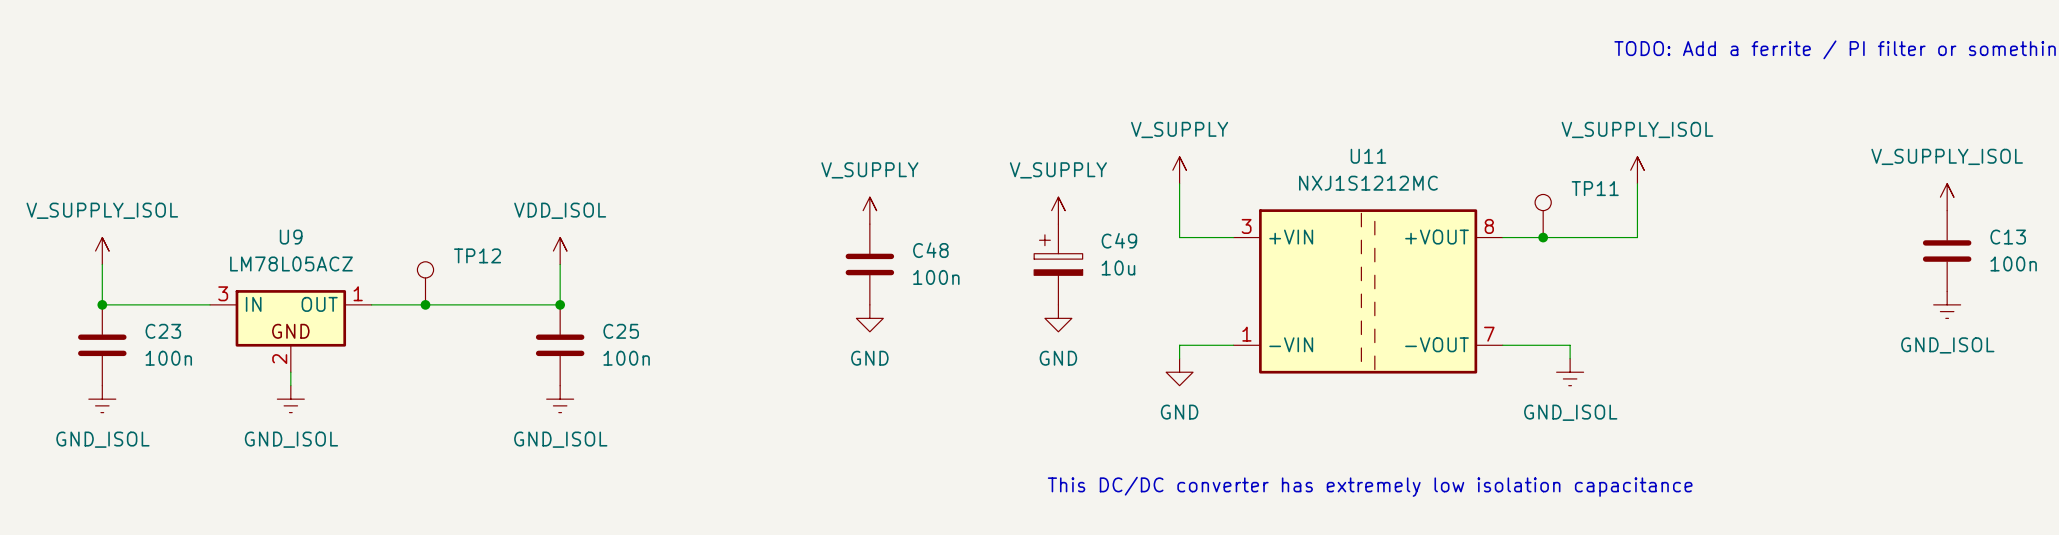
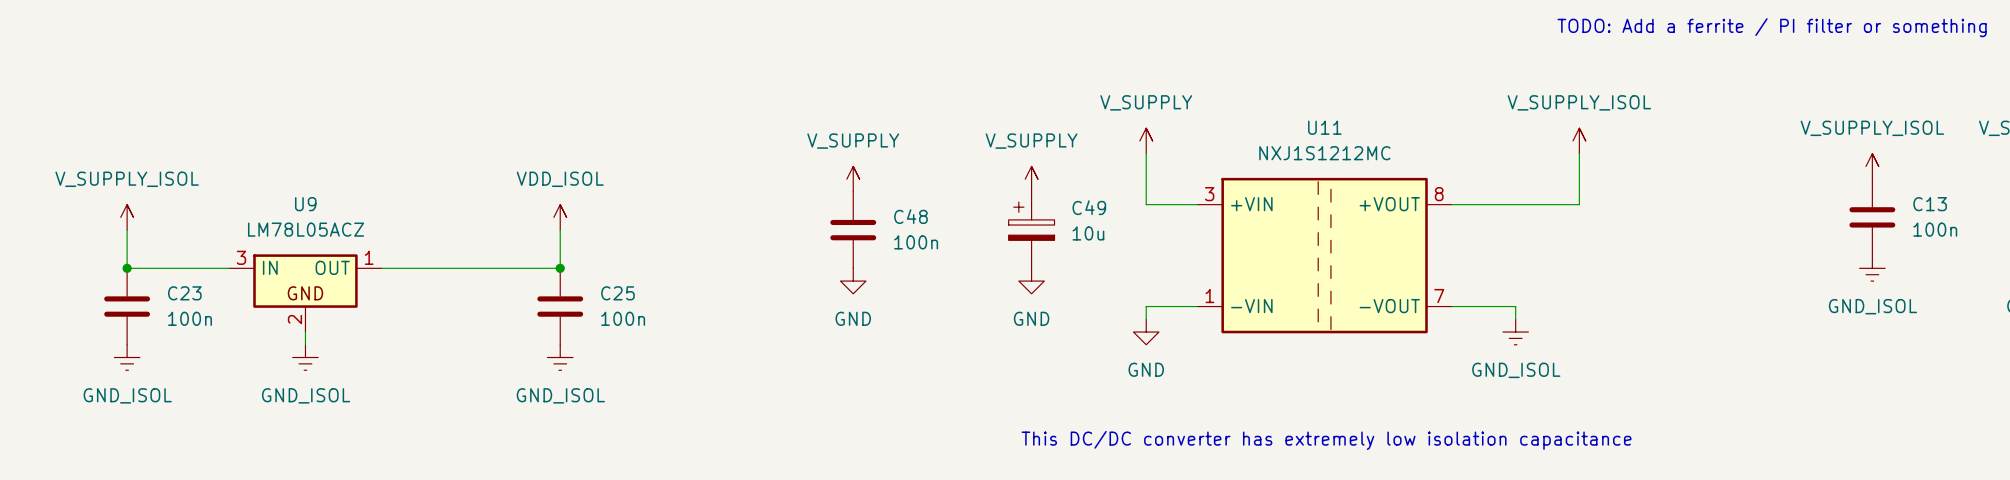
TP11: (1543, 216) -> none
junction: (1543, 237) -> none
TP12: (425, 283) -> none
junction: (425, 304) -> none

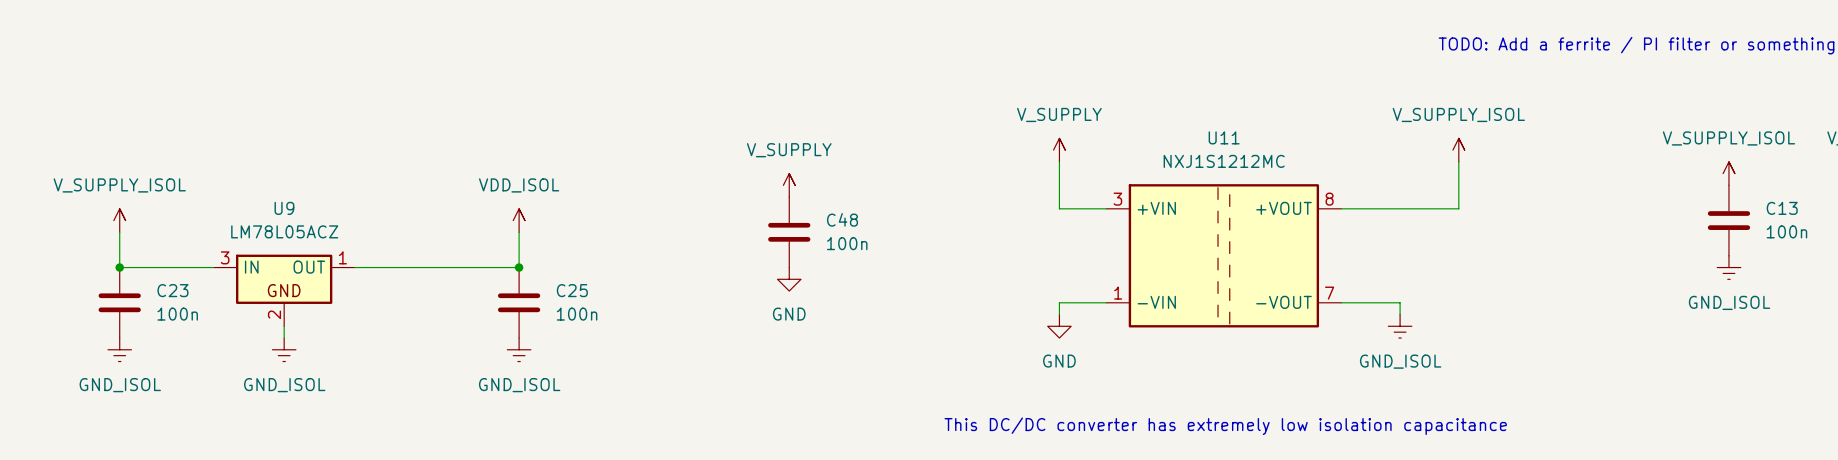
power symbol: V_SUPPLY (1031, 179) -> none
C49: 10u (1031, 230) -> none
power symbol: GND (1031, 281) -> none

